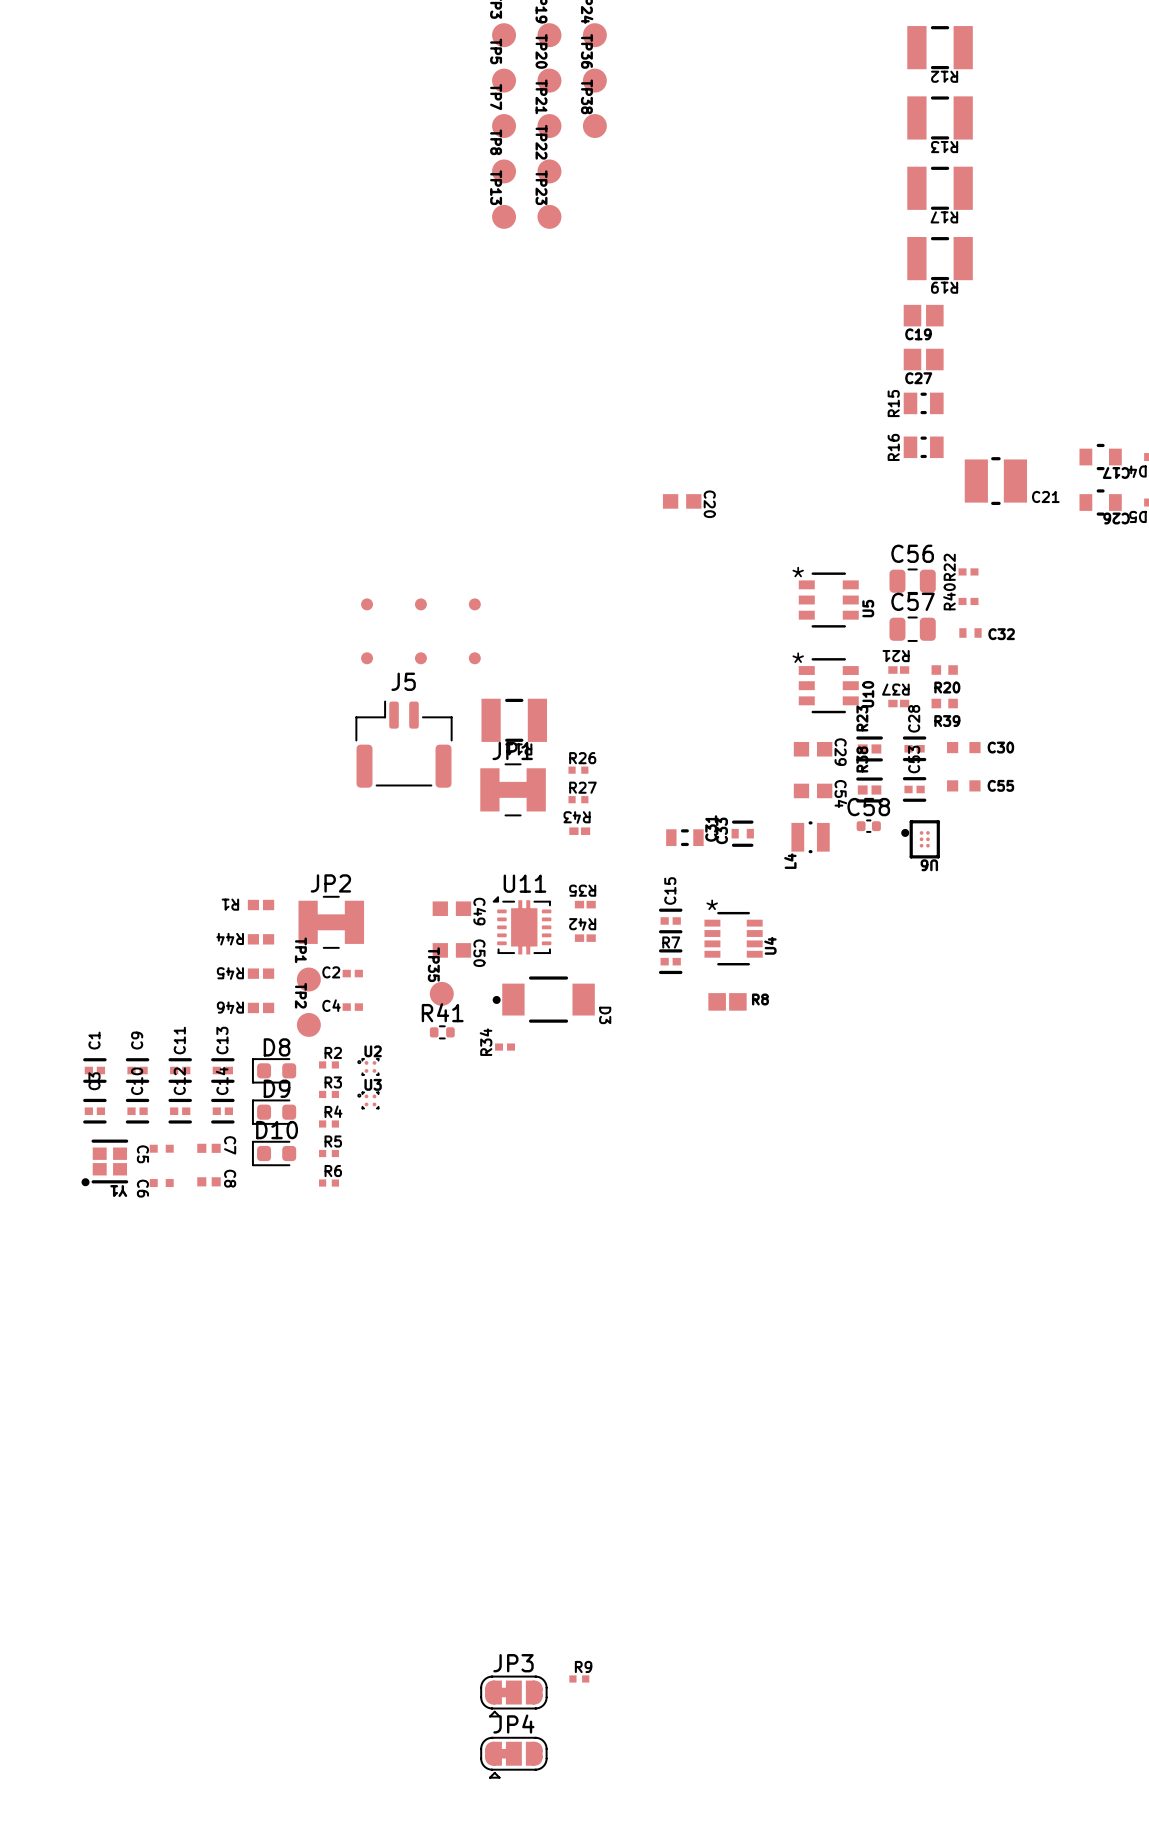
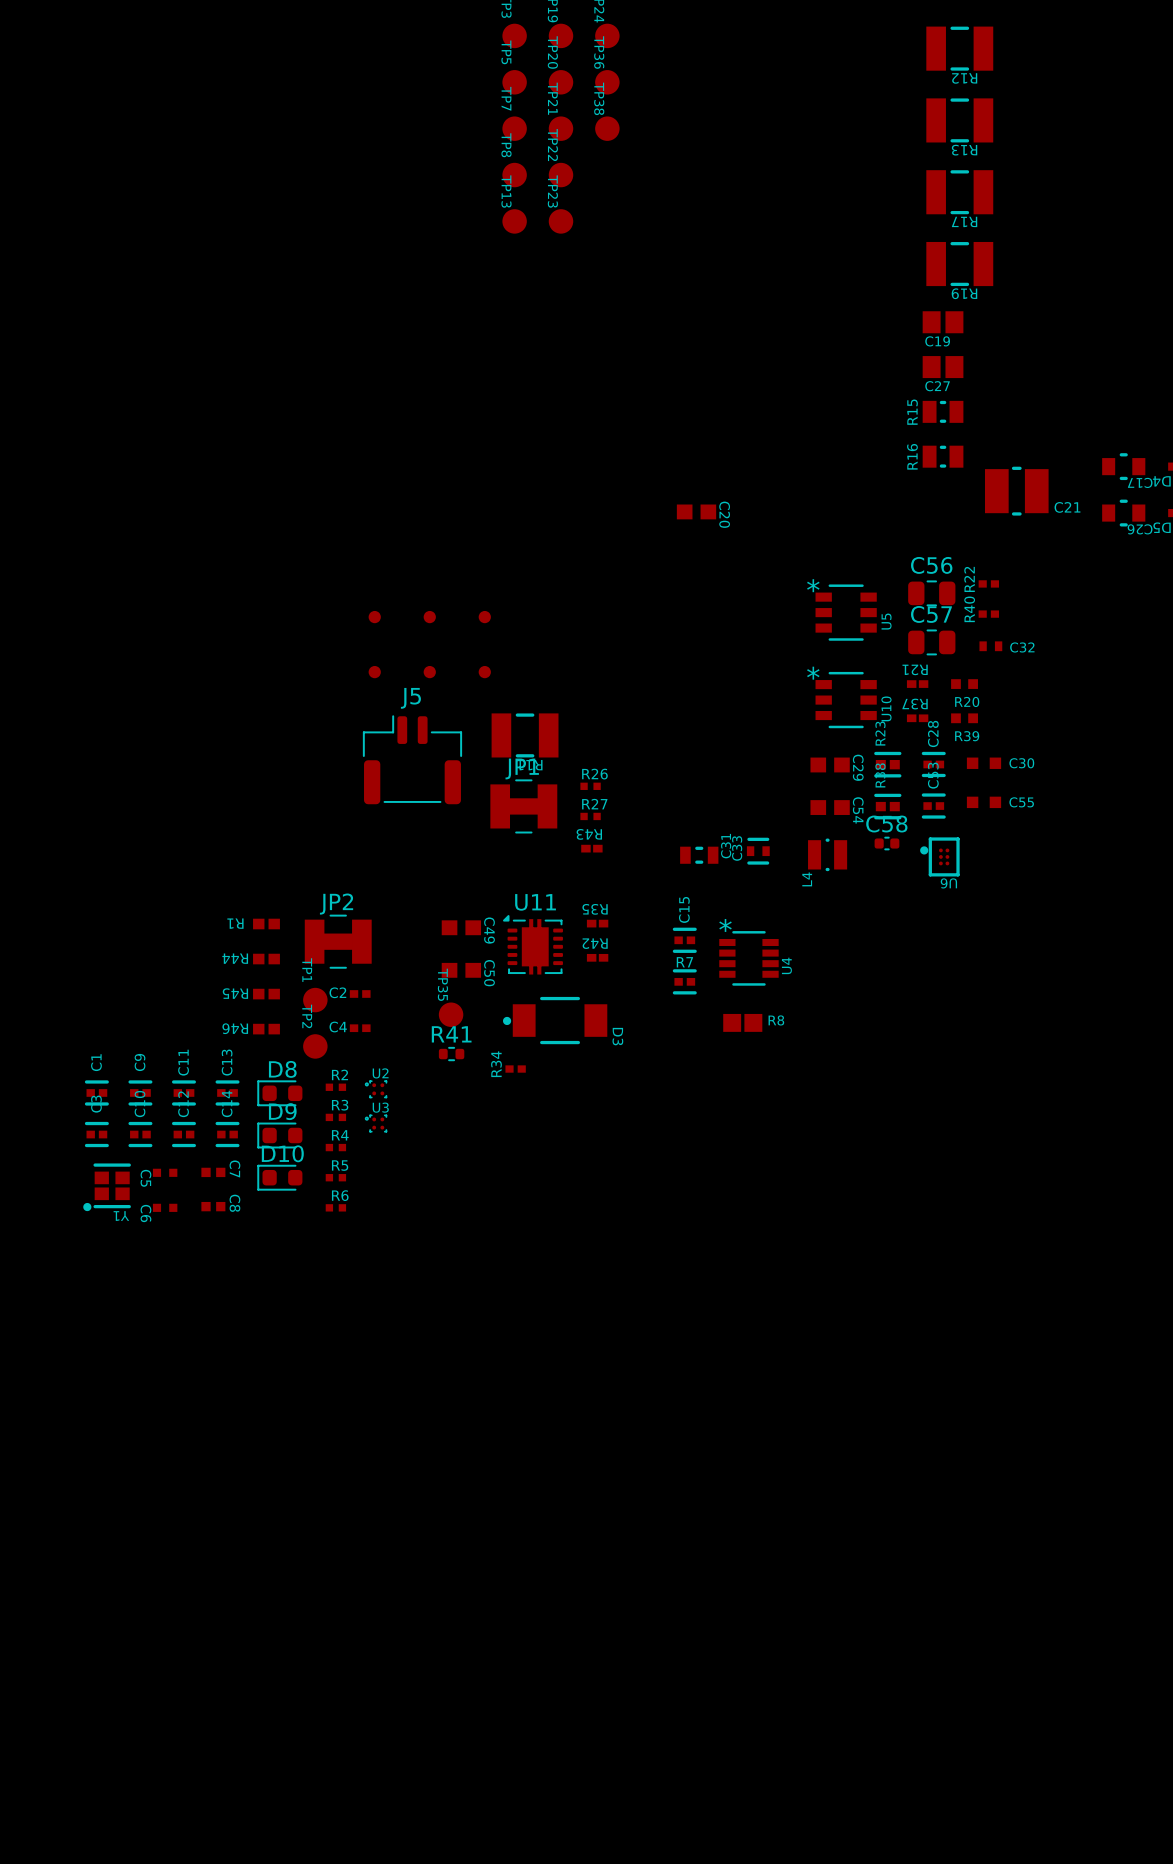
R9: (579, 1678) -> none
JP3: (513, 1696) -> none
JP4: (513, 1757) -> none

